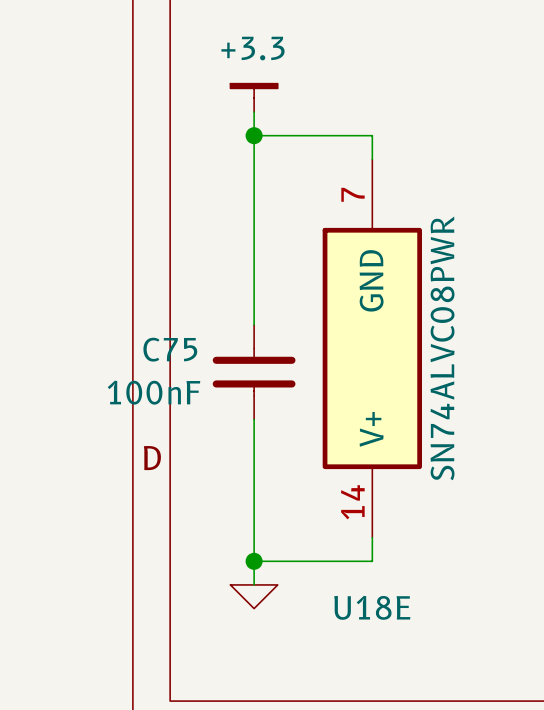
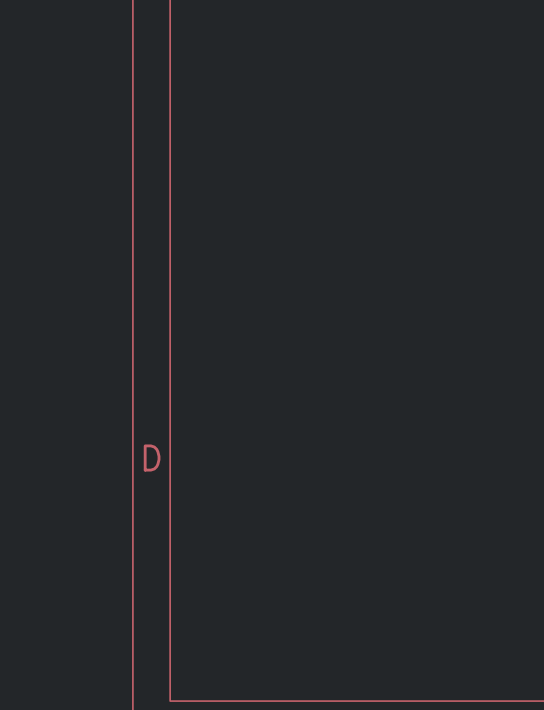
power symbol: +3.3 (254, 97) -> none
wire: (254, 112) (254, 324) -> none
wire: (254, 135) (372, 135) (372, 159) -> none
junction: (254, 135) -> none
U18E: SN74ALVC08PWR (372, 348) -> none
C75: 100nF (254, 372) -> none
wire: (254, 419) (254, 584) -> none
wire: (372, 537) (372, 561) (254, 561) -> none
junction: (254, 561) -> none
power symbol: (254, 596) -> none

